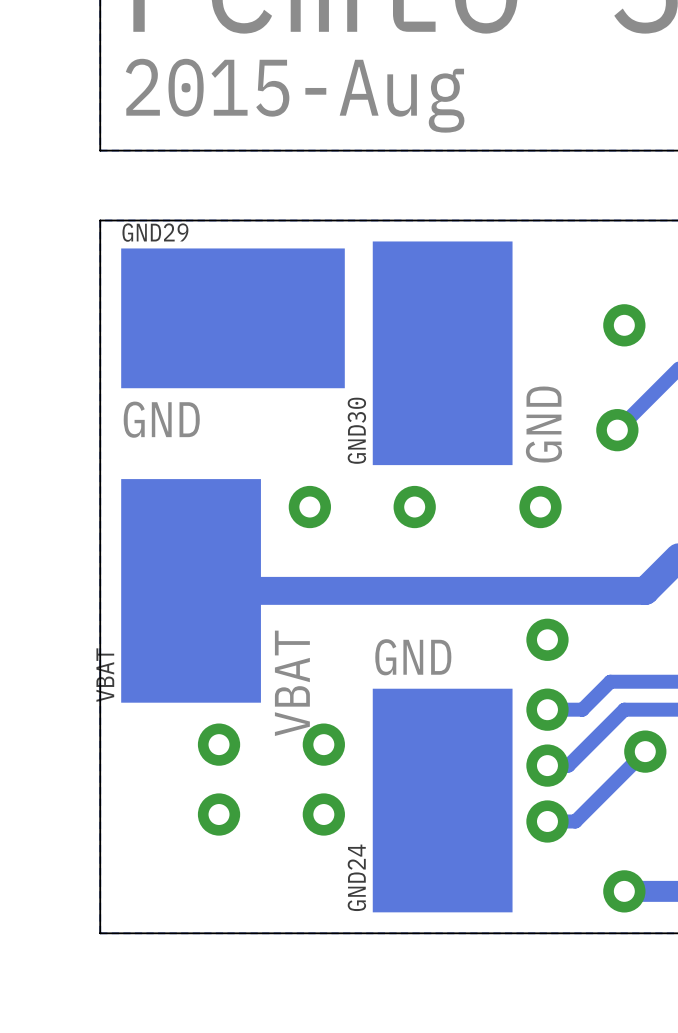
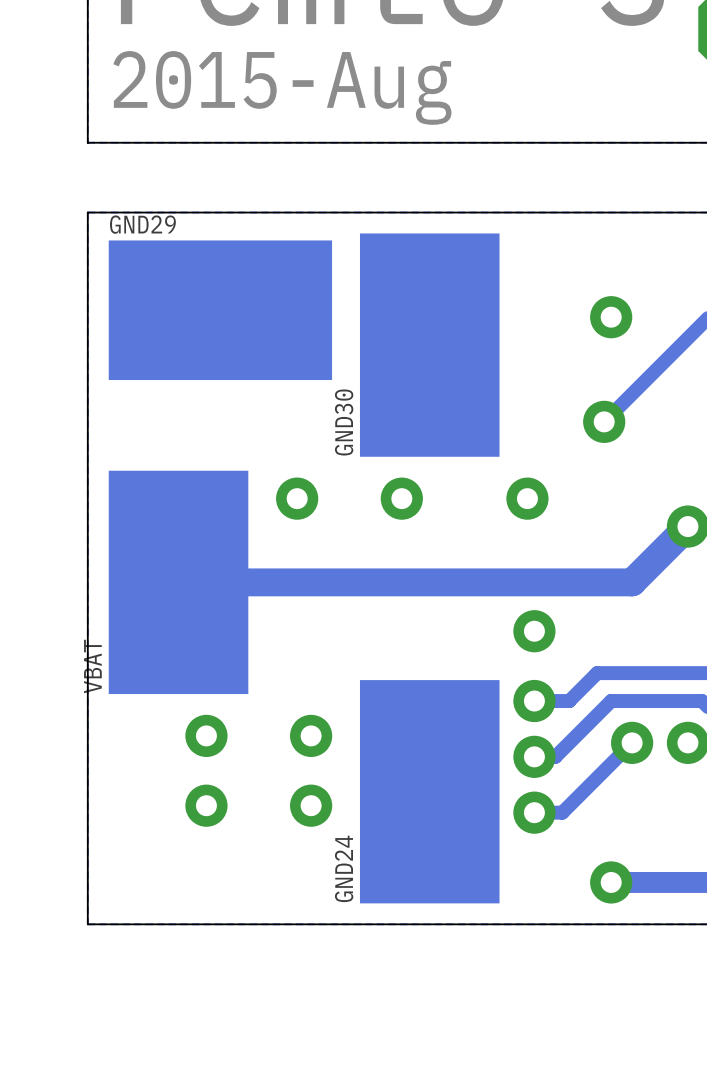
text: GND (161, 419) -> none
text: GND (543, 424) -> none
text: GND (413, 657) -> none
text: VBAT (292, 683) -> none

